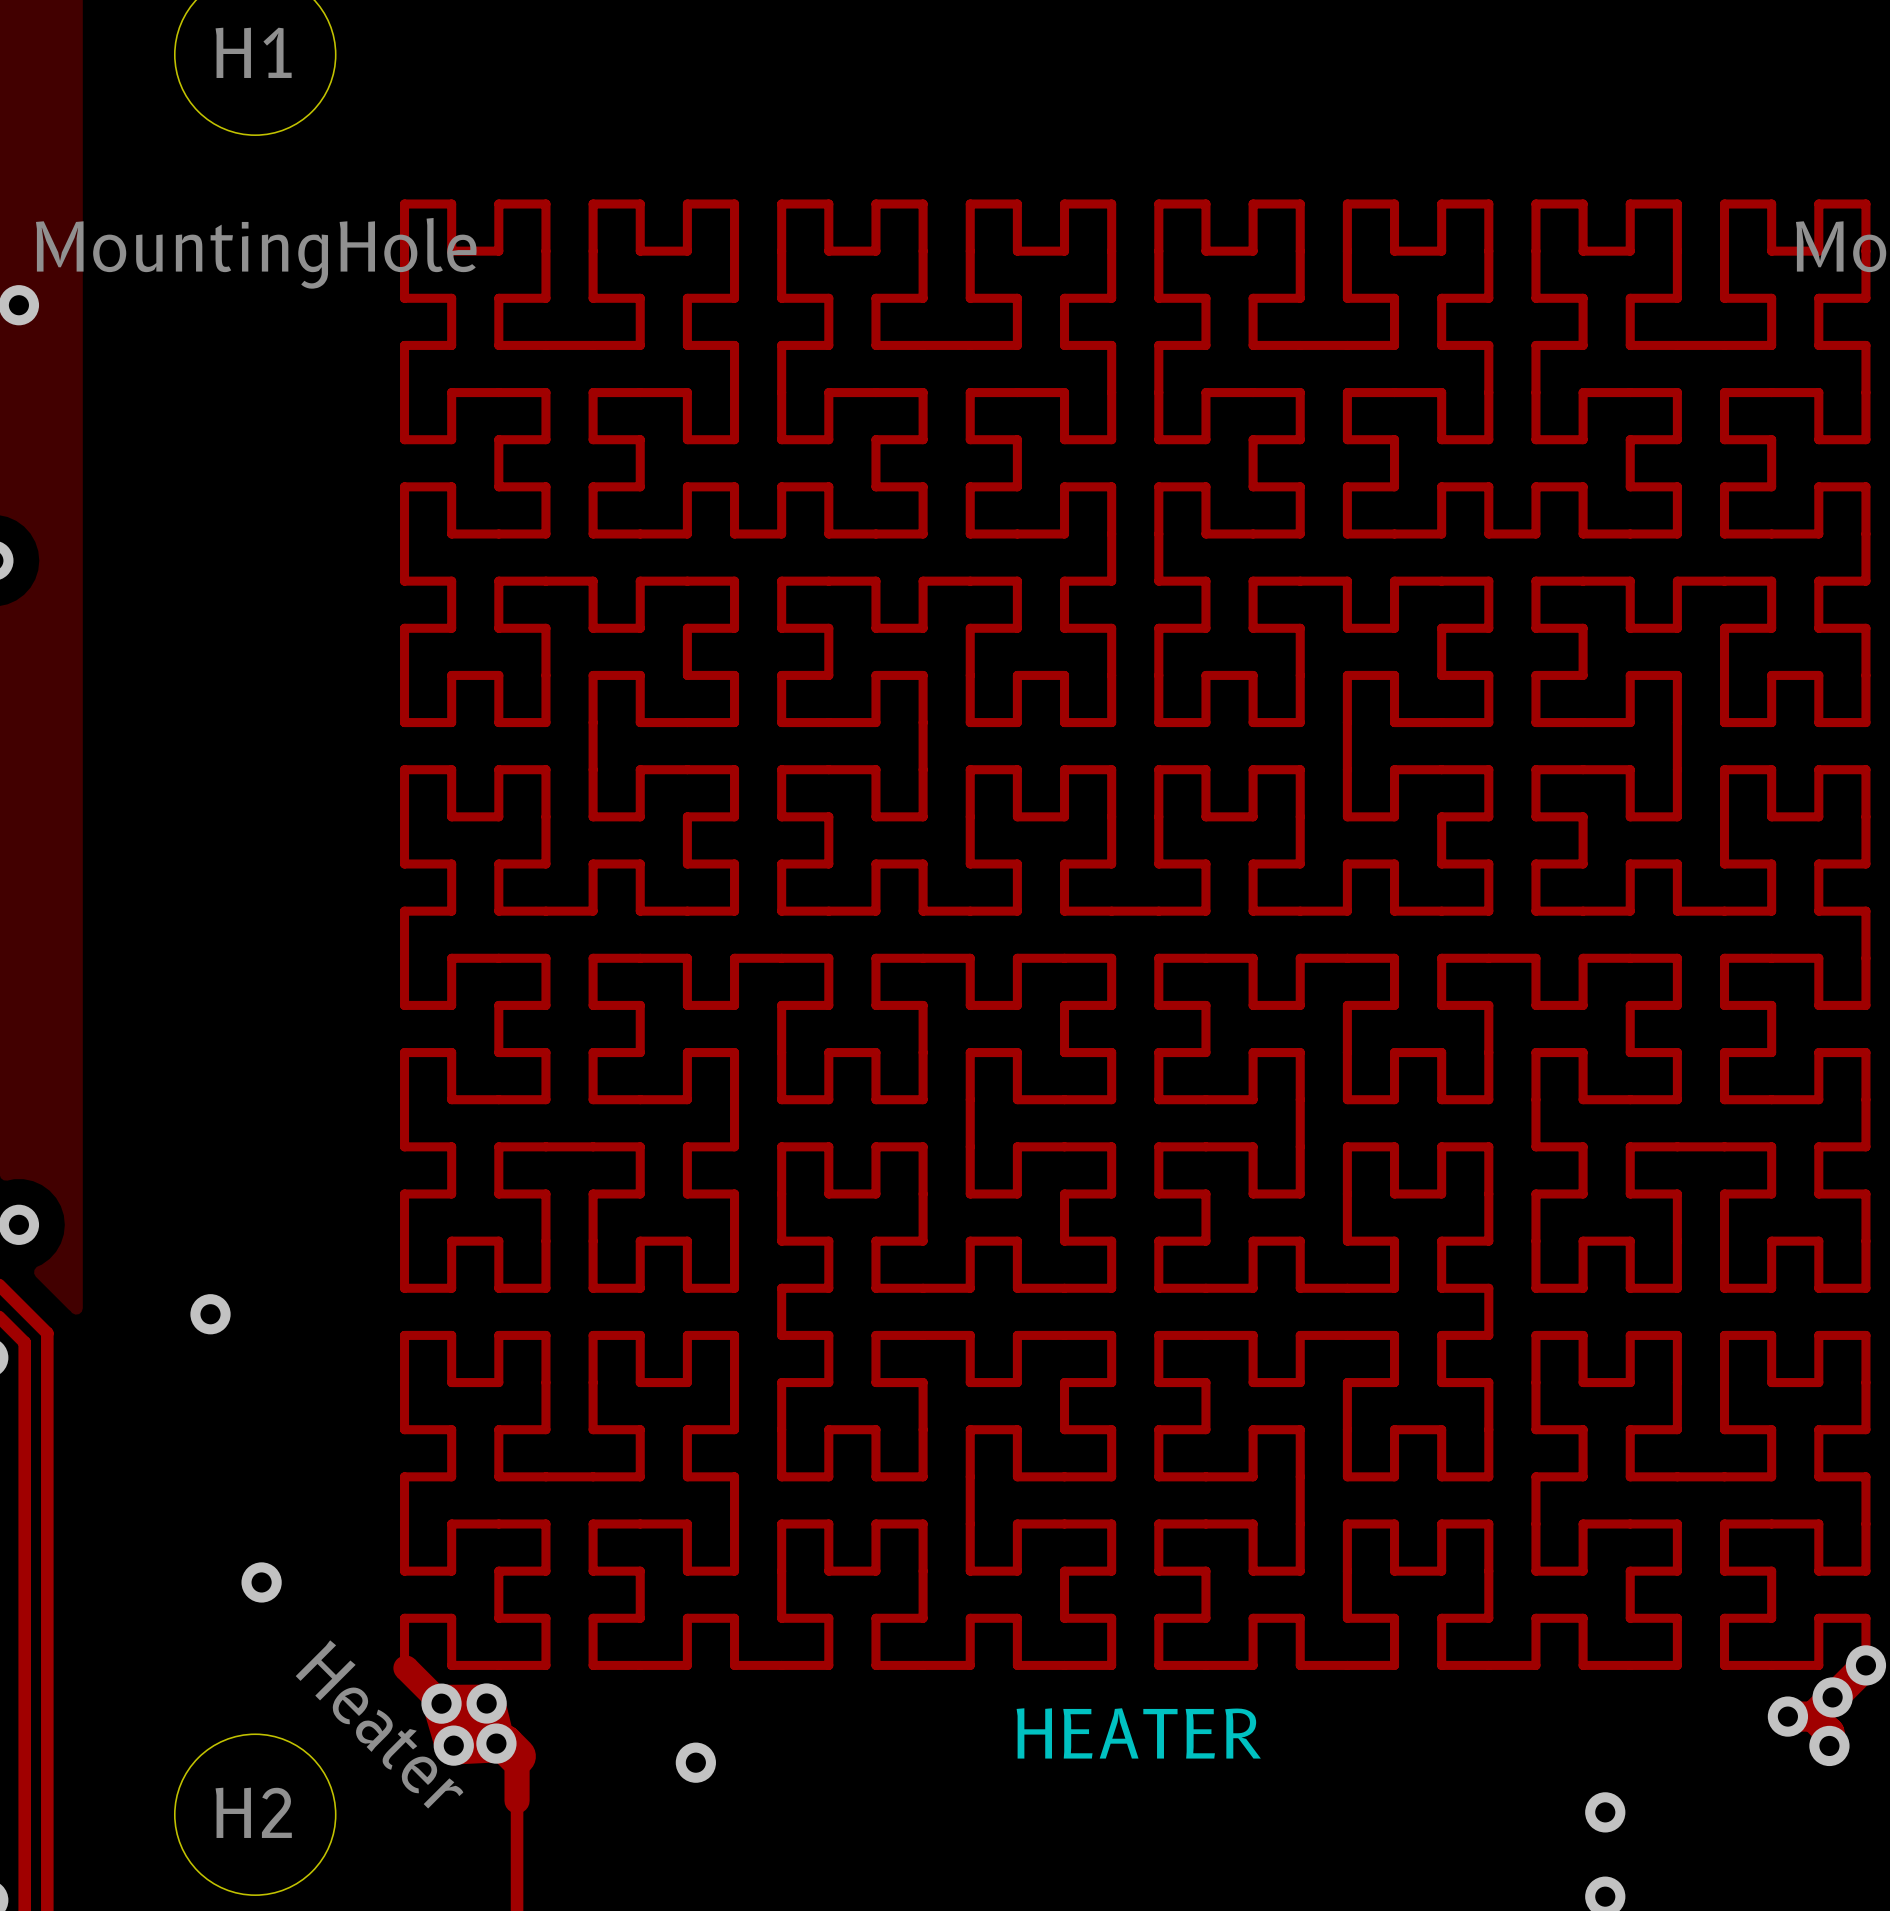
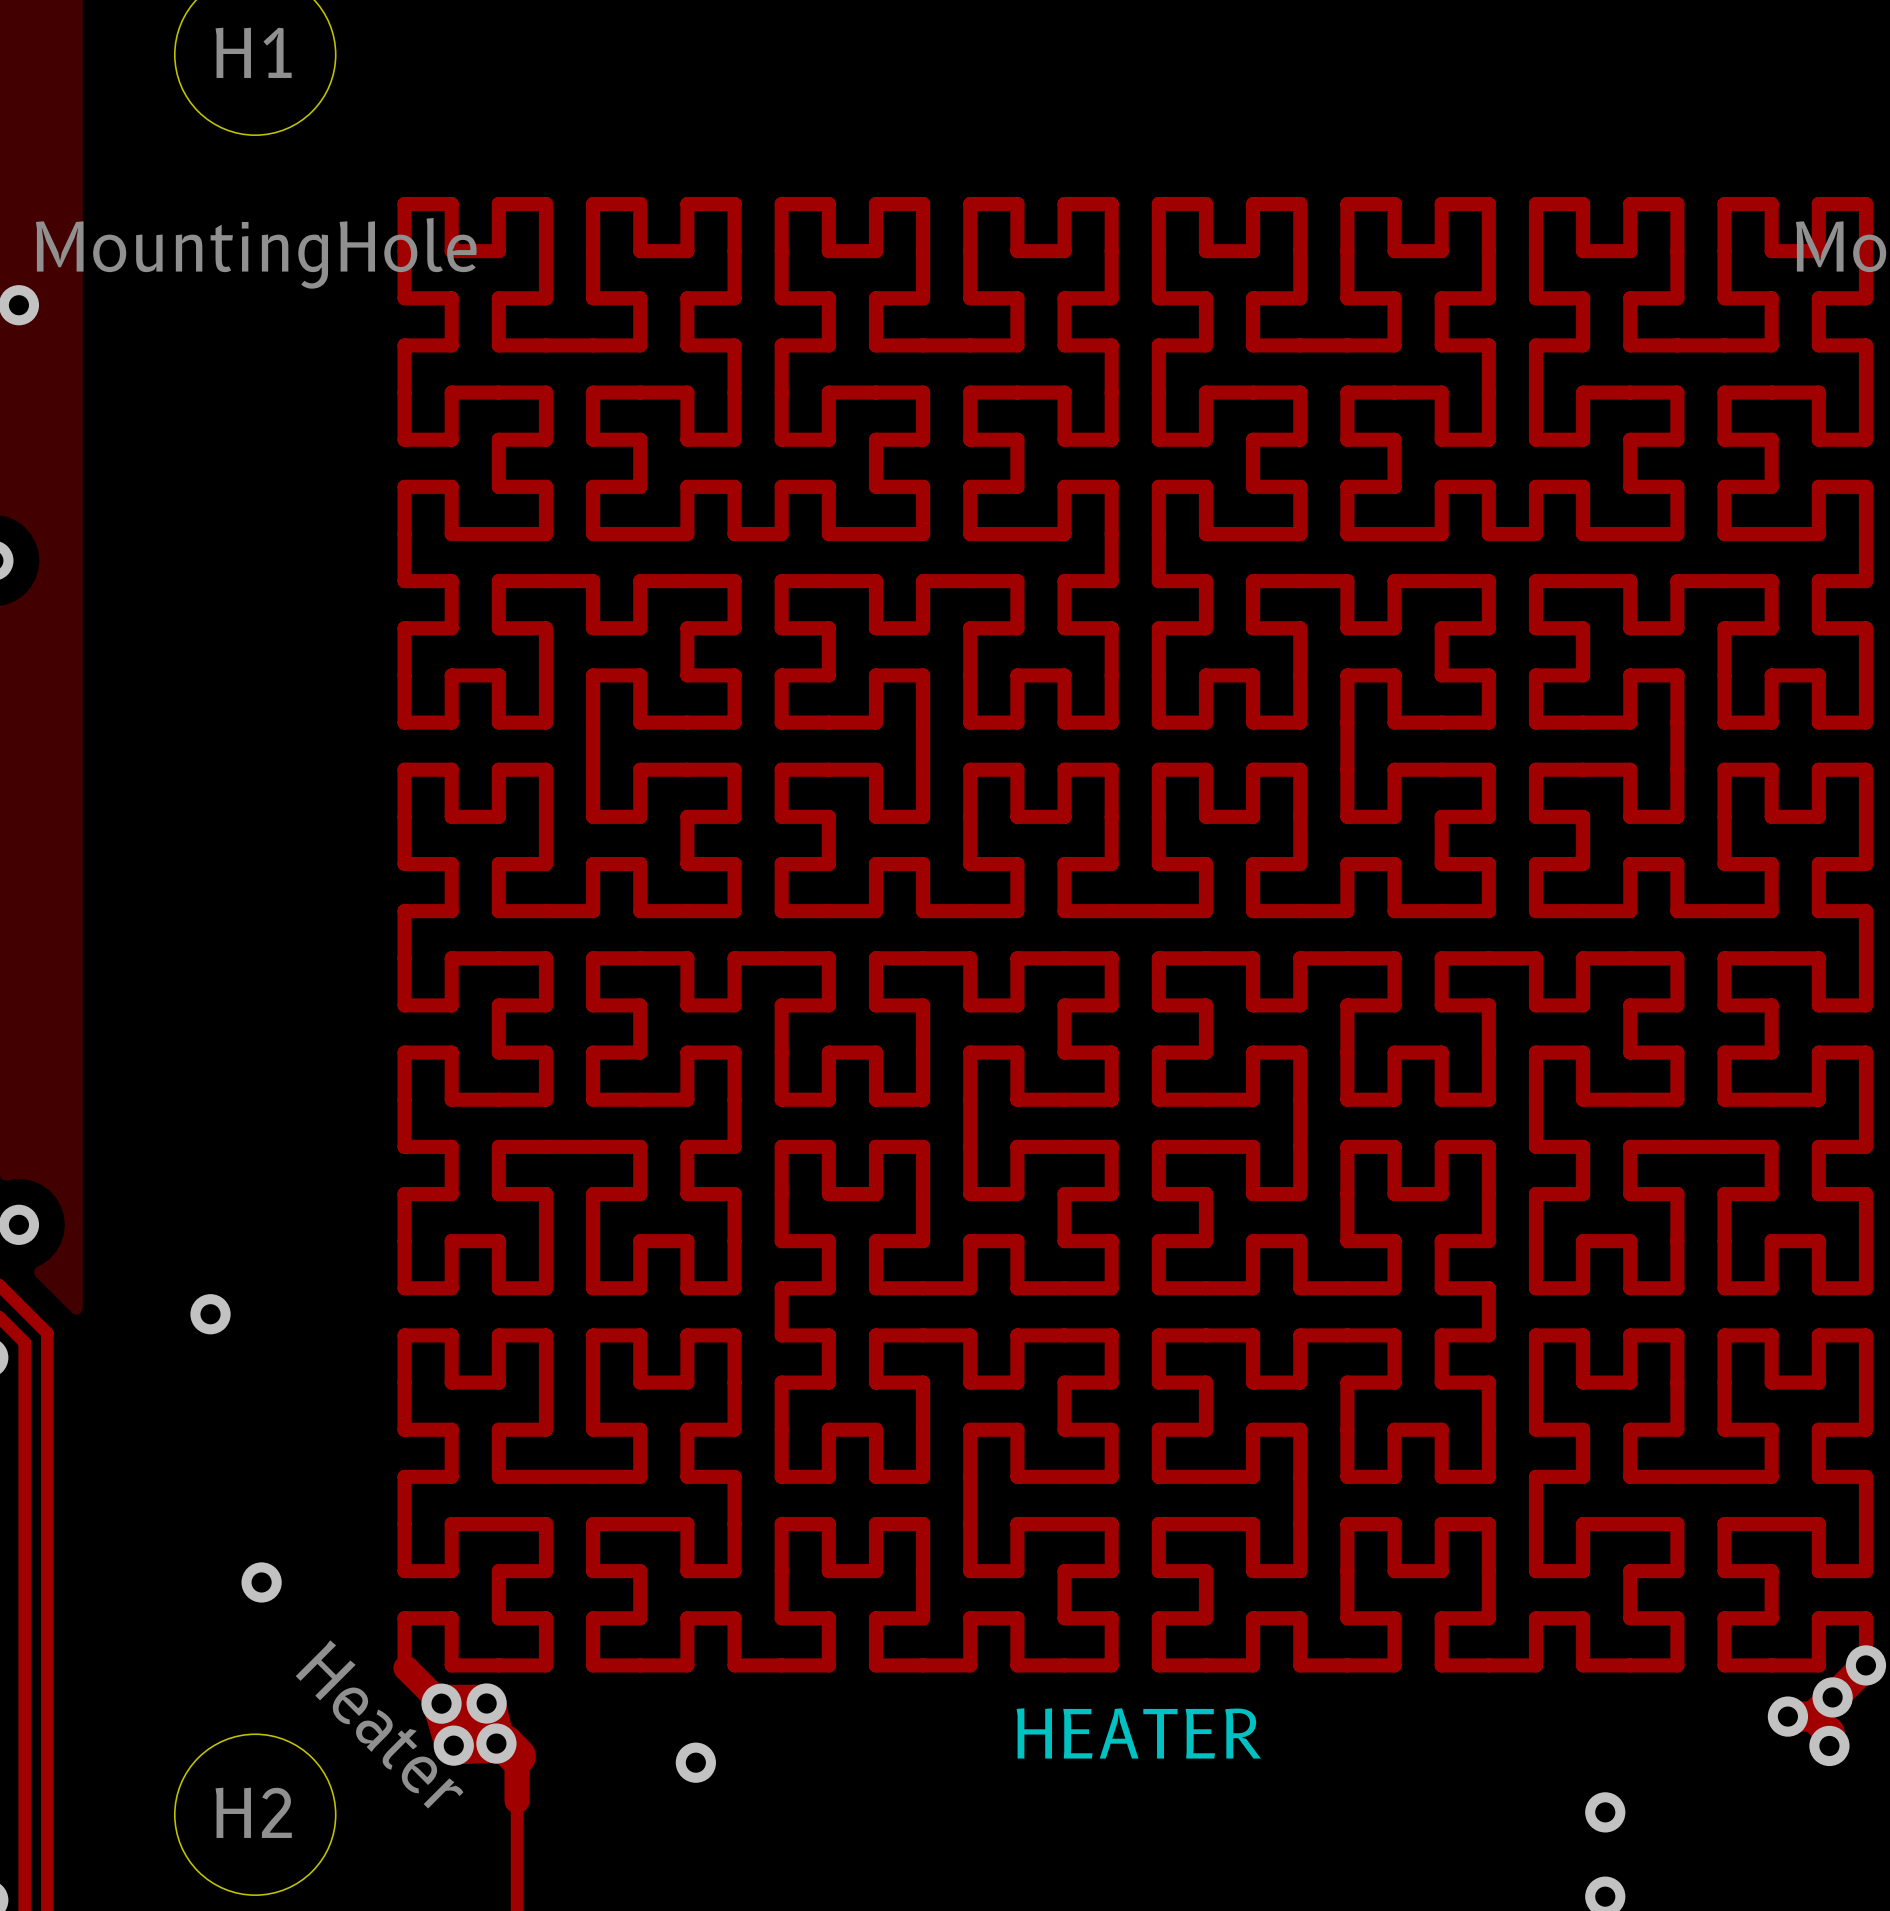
track width: thin (404, 1665) (404, 1618) (451, 1618) (451, 1665) (545, 1665) (545, 1618) (498, 1618) (498, 1571) (545, 1571) (545, 1523) (451, 1523) (451, 1571) (404, 1571) (404, 1476) (451, 1476) (451, 1429) (404, 1429) (404, 1335) (451, 1335) (451, 1382) (498, 1382) (498, 1335) (545, 1335) (545, 1429) (498, 1429) (498, 1476) (640, 1476) (640, 1429) (593, 1429) (593, 1335) (640, 1335) (640, 1382) (687, 1382) (687, 1335) (734, 1335) (734, 1429) (687, 1429) (687, 1476) (734, 1476) (734, 1571) (687, 1571) (687, 1523) (593, 1523) (593, 1571) (640, 1571) (640, 1618) (593, 1618) (593, 1665) (687, 1665) (687, 1618) (734, 1618) (734, 1665) (828, 1665) (828, 1618) (781, 1618) (781, 1523) (828, 1523) (828, 1571) (875, 1571) (875, 1523) (923, 1523) (923, 1618) (875, 1618) (875, 1665) (970, 1665) (970, 1618) (1017, 1618) (1017, 1665) (1111, 1665) (1111, 1618) (1064, 1618) (1064, 1571) (1111, 1571) (1111, 1523) (1017, 1523) (1017, 1571) (970, 1571) (970, 1429) (1017, 1429) (1017, 1476) (1111, 1476) (1111, 1429) (1064, 1429) (1064, 1382) (1111, 1382) (1111, 1335) (1017, 1335) (1017, 1382) (970, 1382) (970, 1335) (875, 1335) (875, 1382) (923, 1382) (923, 1476) (875, 1476) (875, 1429) (828, 1429) (828, 1476) (781, 1476) (781, 1382) (828, 1382) (828, 1335) (781, 1335) (781, 1288) (828, 1288) (828, 1241) (781, 1241) (781, 1146) (828, 1146) (828, 1193) (875, 1193) (875, 1146) (923, 1146) (923, 1241) (875, 1241) (875, 1288) (970, 1288) (970, 1241) (1017, 1241) (1017, 1288) (1111, 1288) (1111, 1241) (1064, 1241) (1064, 1193) (1111, 1193) (1111, 1146) (1017, 1146) (1017, 1193) (970, 1193) (970, 1052) (1017, 1052) (1017, 1099) (1111, 1099) (1111, 1052) (1064, 1052) (1064, 1005) (1111, 1005) (1111, 958) (1017, 958) (1017, 1005) (970, 1005) (970, 958) (875, 958) (875, 1005) (923, 1005) (923, 1099) (875, 1099) (875, 1052) (828, 1052) (828, 1099) (781, 1099) (781, 1005) (828, 1005) (828, 958) (734, 958) (734, 1005) (687, 1005) (687, 958) (593, 958) (593, 1005) (640, 1005) (640, 1052) (593, 1052) (593, 1099) (687, 1099) (687, 1052) (734, 1052) (734, 1146) (687, 1146) (687, 1193) (734, 1193) (734, 1288) (687, 1288) (687, 1241) (640, 1241) (640, 1288) (593, 1288) (593, 1193) (640, 1193) (640, 1146) (498, 1146) (498, 1193) (545, 1193) (545, 1288) (498, 1288) (498, 1241) (451, 1241) (451, 1288) (404, 1288) (404, 1193) (451, 1193) (451, 1146) (404, 1146) (404, 1052) (451, 1052) (451, 1099) (545, 1099) (545, 1052) (498, 1052) (498, 1005) (545, 1005) (545, 958) (451, 958) (451, 1005) (404, 1005) (404, 911) (451, 911) (451, 863) (404, 863) (404, 769) (451, 769) (451, 816) (498, 816) (498, 769) (545, 769) (545, 863) (498, 863) (498, 911) (593, 911) (593, 863) (640, 863) (640, 911) (734, 911) (734, 863) (687, 863) (687, 816) (734, 816) (734, 769) (640, 769) (640, 816) (593, 816) (593, 675) (640, 675) (640, 722) (734, 722) (734, 675) (687, 675) (687, 628) (734, 628) (734, 581) (640, 581) (640, 628) (593, 628) (593, 581) (498, 581) (498, 628) (545, 628) (545, 722) (498, 722) (498, 675) (451, 675) (451, 722) (404, 722) (404, 628) (451, 628) (451, 581) (404, 581) (404, 486) (451, 486) (451, 533) (545, 533) (545, 486) (498, 486) (498, 439) (545, 439) (545, 392) (451, 392) (451, 439) (404, 439) (404, 345) (451, 345) (451, 298) (404, 298) (404, 204) (451, 204) (451, 251) (498, 251) (498, 204) (545, 204) (545, 298) (498, 298) (498, 345) (640, 345) (640, 298) (593, 298) (593, 204) (640, 204) (640, 251) (687, 251) (687, 204) (734, 204) (734, 298) (687, 298) (687, 345) (734, 345) (734, 439) (687, 439) (687, 392) (593, 392) (593, 439) (640, 439) (640, 486) (593, 486) (593, 533) (687, 533) (687, 486) (734, 486) (734, 533) (781, 533) (781, 486) (828, 486) (828, 533) (923, 533) (923, 486) (875, 486) (875, 439) (923, 439) (923, 392) (828, 392) (828, 439) (781, 439) (781, 345) (828, 345) (828, 298) (781, 298) (781, 204) (828, 204) (828, 251) (875, 251) (875, 204) (923, 204) (923, 298) (875, 298) (875, 345) (1017, 345) (1017, 298) (970, 298) (970, 204) (1017, 204) (1017, 251) (1064, 251) (1064, 204) (1111, 204) (1111, 298) (1064, 298) (1064, 345) (1111, 345) (1111, 439) (1064, 439) (1064, 392) (970, 392) (970, 439) (1017, 439) (1017, 486) (970, 486) (970, 533) (1064, 533) (1064, 486) (1111, 486) (1111, 581) (1064, 581) (1064, 628) (1111, 628) (1111, 722) (1064, 722) (1064, 675) (1017, 675) (1017, 722) (970, 722) (970, 628) (1017, 628) (1017, 581) (923, 581) (923, 628) (875, 628) (875, 581) (781, 581) (781, 628) (828, 628) (828, 675) (781, 675) (781, 722) (875, 722) (875, 675) (923, 675) (923, 816) (875, 816) (875, 769) (781, 769) (781, 816) (828, 816) (828, 863) (781, 863) (781, 911) (875, 911) (875, 863) (923, 863) (923, 911) (1017, 911) (1017, 863) (970, 863) (970, 769) (1017, 769) (1017, 816) (1064, 816) (1064, 769) (1111, 769) (1111, 863) (1064, 863) (1064, 911) (1205, 911) (1205, 863) (1158, 863) (1158, 769) (1205, 769) (1205, 816) (1253, 816) (1253, 769) (1300, 769) (1300, 863) (1253, 863) (1253, 911) (1347, 911) (1347, 863) (1394, 863) (1394, 911) (1488, 911) (1488, 863) (1441, 863) (1441, 816) (1488, 816) (1488, 769) (1394, 769) (1394, 816) (1347, 816) (1347, 675) (1394, 675) (1394, 722) (1488, 722) (1488, 675) (1441, 675) (1441, 628) (1488, 628) (1488, 581) (1394, 581) (1394, 628) (1347, 628) (1347, 581) (1253, 581) (1253, 628) (1300, 628) (1300, 722) (1253, 722) (1253, 675) (1205, 675) (1205, 722) (1158, 722) (1158, 628) (1205, 628) (1205, 581) (1158, 581) (1158, 486) (1205, 486) (1205, 533) (1300, 533) (1300, 486) (1253, 486) (1253, 439) (1300, 439) (1300, 392) (1205, 392) (1205, 439) (1158, 439) (1158, 345) (1205, 345) (1205, 298) (1158, 298) (1158, 204) (1205, 204) (1205, 251) (1253, 251) (1253, 204) (1300, 204) (1300, 298) (1253, 298) (1253, 345) (1394, 345) (1394, 298) (1347, 298) (1347, 204) (1394, 204) (1394, 251) (1441, 251) (1441, 204) (1488, 204) (1488, 298) (1441, 298) (1441, 345) (1488, 345) (1488, 439) (1441, 439) (1441, 392) (1347, 392) (1347, 439) (1394, 439) (1394, 486) (1347, 486) (1347, 533) (1441, 533) (1441, 486) (1488, 486) (1488, 533) (1535, 533) (1535, 486) (1583, 486) (1583, 533) (1677, 533) (1677, 486) (1630, 486) (1630, 439) (1677, 439) (1677, 392) (1583, 392) (1583, 439) (1535, 439) (1535, 345) (1583, 345) (1583, 298) (1535, 298) (1535, 204) (1583, 204) (1583, 251) (1630, 251) (1630, 204) (1677, 204) (1677, 298) (1630, 298) (1630, 345) (1771, 345) (1771, 298) (1724, 298) (1724, 204) (1771, 204) (1771, 251) (1818, 251) (1818, 204) (1865, 204) (1865, 298) (1818, 298) (1818, 345) (1865, 345) (1865, 439) (1818, 439) (1818, 392) (1724, 392) (1724, 439) (1771, 439) (1771, 486) (1724, 486) (1724, 533) (1818, 533) (1818, 486) (1865, 486) (1865, 581) (1818, 581) (1818, 628) (1865, 628) (1865, 722) (1818, 722) (1818, 675) (1771, 675) (1771, 722) (1724, 722) (1724, 628) (1771, 628) (1771, 581) (1677, 581) (1677, 628) (1630, 628) (1630, 581) (1535, 581) (1535, 628) (1583, 628) (1583, 675) (1535, 675) (1535, 722) (1630, 722) (1630, 675) (1677, 675) (1677, 816) (1630, 816) (1630, 769) (1535, 769) (1535, 816) (1583, 816) (1583, 863) (1535, 863) (1535, 911) (1630, 911) (1630, 863) (1677, 863) (1677, 911) (1771, 911) (1771, 863) (1724, 863) (1724, 769) (1771, 769) (1771, 816) (1818, 816) (1818, 769) (1865, 769) (1865, 863) (1818, 863) (1818, 911) (1865, 911) (1865, 1005) (1818, 1005) (1818, 958) (1724, 958) (1724, 1005) (1771, 1005) (1771, 1052) (1724, 1052) (1724, 1099) (1818, 1099) (1818, 1052) (1865, 1052) (1865, 1146) (1818, 1146) (1818, 1193) (1865, 1193) (1865, 1288) (1818, 1288) (1818, 1241) (1771, 1241) (1771, 1288) (1724, 1288) (1724, 1193) (1771, 1193) (1771, 1146) (1630, 1146) (1630, 1193) (1677, 1193) (1677, 1288) (1630, 1288) (1630, 1241) (1583, 1241) (1583, 1288) (1535, 1288) (1535, 1193) (1583, 1193) (1583, 1146) (1535, 1146) (1535, 1052) (1583, 1052) (1583, 1099) (1677, 1099) (1677, 1052) (1630, 1052) (1630, 1005) (1677, 1005) (1677, 958) (1583, 958) (1583, 1005) (1535, 1005) (1535, 958) (1441, 958) (1441, 1005) (1488, 1005) (1488, 1099) (1441, 1099) (1441, 1052) (1394, 1052) (1394, 1099) (1347, 1099) (1347, 1005) (1394, 1005) (1394, 958) (1300, 958) (1300, 1005) (1253, 1005) (1253, 958) (1158, 958) (1158, 1005) (1205, 1005) (1205, 1052) (1158, 1052) (1158, 1099) (1253, 1099) (1253, 1052) (1300, 1052) (1300, 1193) (1253, 1193) (1253, 1146) (1158, 1146) (1158, 1193) (1205, 1193) (1205, 1241) (1158, 1241) (1158, 1288) (1253, 1288) (1253, 1241) (1300, 1241) (1300, 1288) (1394, 1288) (1394, 1241) (1347, 1241) (1347, 1146) (1394, 1146) (1394, 1193) (1441, 1193) (1441, 1146) (1488, 1146) (1488, 1241) (1441, 1241) (1441, 1288) (1488, 1288) (1488, 1335) (1441, 1335) (1441, 1382) (1488, 1382) (1488, 1476) (1441, 1476) (1441, 1429) (1394, 1429) (1394, 1476) (1347, 1476) (1347, 1382) (1394, 1382) (1394, 1335) (1300, 1335) (1300, 1382) (1253, 1382) (1253, 1335) (1158, 1335) (1158, 1382) (1205, 1382) (1205, 1429) (1158, 1429) (1158, 1476) (1253, 1476) (1253, 1429) (1300, 1429) (1300, 1571) (1253, 1571) (1253, 1523) (1158, 1523) (1158, 1571) (1205, 1571) (1205, 1618) (1158, 1618) (1158, 1665) (1253, 1665) (1253, 1618) (1300, 1618) (1300, 1665) (1394, 1665) (1394, 1618) (1347, 1618) (1347, 1523) (1394, 1523) (1394, 1571) (1441, 1571) (1441, 1523) (1488, 1523) (1488, 1618) (1441, 1618) (1441, 1665) (1535, 1665) (1535, 1618) (1583, 1618) (1583, 1665) (1677, 1665) (1677, 1618) (1630, 1618) (1630, 1571) (1677, 1571) (1677, 1523) (1583, 1523) (1583, 1571) (1535, 1571) (1535, 1476) (1583, 1476) (1583, 1429) (1535, 1429) (1535, 1335) (1583, 1335) (1583, 1382) (1630, 1382) (1630, 1335) (1677, 1335) (1677, 1429) (1630, 1429) (1630, 1476) (1771, 1476) (1771, 1429) (1724, 1429) (1724, 1335) (1771, 1335) (1771, 1382) (1818, 1382) (1818, 1335) (1865, 1335) (1865, 1429) (1818, 1429) (1818, 1476) (1865, 1476) (1865, 1571) (1818, 1571) (1818, 1523) (1724, 1523) (1724, 1571) (1771, 1571) (1771, 1618) (1724, 1618) (1724, 1665) (1818, 1665) (1818, 1618) (1865, 1618) (1865, 1665) -> thick (404, 1665) (404, 1618) (451, 1618) (451, 1665) (545, 1665) (545, 1618) (498, 1618) (498, 1571) (545, 1571) (545, 1523) (451, 1523) (451, 1571) (404, 1571) (404, 1476) (451, 1476) (451, 1429) (404, 1429) (404, 1335) (451, 1335) (451, 1382) (498, 1382) (498, 1335) (545, 1335) (545, 1429) (498, 1429) (498, 1476) (640, 1476) (640, 1429) (593, 1429) (593, 1335) (640, 1335) (640, 1382) (687, 1382) (687, 1335) (734, 1335) (734, 1429) (687, 1429) (687, 1476) (734, 1476) (734, 1571) (687, 1571) (687, 1523) (593, 1523) (593, 1571) (640, 1571) (640, 1618) (593, 1618) (593, 1665) (687, 1665) (687, 1618) (734, 1618) (734, 1665) (828, 1665) (828, 1618) (781, 1618) (781, 1523) (828, 1523) (828, 1571) (875, 1571) (875, 1523) (923, 1523) (923, 1618) (875, 1618) (875, 1665) (970, 1665) (970, 1618) (1017, 1618) (1017, 1665) (1111, 1665) (1111, 1618) (1064, 1618) (1064, 1571) (1111, 1571) (1111, 1523) (1017, 1523) (1017, 1571) (970, 1571) (970, 1429) (1017, 1429) (1017, 1476) (1111, 1476) (1111, 1429) (1064, 1429) (1064, 1382) (1111, 1382) (1111, 1335) (1017, 1335) (1017, 1382) (970, 1382) (970, 1335) (875, 1335) (875, 1382) (923, 1382) (923, 1476) (875, 1476) (875, 1429) (828, 1429) (828, 1476) (781, 1476) (781, 1382) (828, 1382) (828, 1335) (781, 1335) (781, 1288) (828, 1288) (828, 1241) (781, 1241) (781, 1146) (828, 1146) (828, 1193) (875, 1193) (875, 1146) (923, 1146) (923, 1241) (875, 1241) (875, 1288) (970, 1288) (970, 1241) (1017, 1241) (1017, 1288) (1111, 1288) (1111, 1241) (1064, 1241) (1064, 1193) (1111, 1193) (1111, 1146) (1017, 1146) (1017, 1193) (970, 1193) (970, 1052) (1017, 1052) (1017, 1099) (1111, 1099) (1111, 1052) (1064, 1052) (1064, 1005) (1111, 1005) (1111, 958) (1017, 958) (1017, 1005) (970, 1005) (970, 958) (875, 958) (875, 1005) (923, 1005) (923, 1099) (875, 1099) (875, 1052) (828, 1052) (828, 1099) (781, 1099) (781, 1005) (828, 1005) (828, 958) (734, 958) (734, 1005) (687, 1005) (687, 958) (593, 958) (593, 1005) (640, 1005) (640, 1052) (593, 1052) (593, 1099) (687, 1099) (687, 1052) (734, 1052) (734, 1146) (687, 1146) (687, 1193) (734, 1193) (734, 1288) (687, 1288) (687, 1241) (640, 1241) (640, 1288) (593, 1288) (593, 1193) (640, 1193) (640, 1146) (498, 1146) (498, 1193) (545, 1193) (545, 1288) (498, 1288) (498, 1241) (451, 1241) (451, 1288) (404, 1288) (404, 1193) (451, 1193) (451, 1146) (404, 1146) (404, 1052) (451, 1052) (451, 1099) (545, 1099) (545, 1052) (498, 1052) (498, 1005) (545, 1005) (545, 958) (451, 958) (451, 1005) (404, 1005) (404, 911) (451, 911) (451, 863) (404, 863) (404, 769) (451, 769) (451, 816) (498, 816) (498, 769) (545, 769) (545, 863) (498, 863) (498, 911) (593, 911) (593, 863) (640, 863) (640, 911) (734, 911) (734, 863) (687, 863) (687, 816) (734, 816) (734, 769) (640, 769) (640, 816) (593, 816) (593, 675) (640, 675) (640, 722) (734, 722) (734, 675) (687, 675) (687, 628) (734, 628) (734, 581) (640, 581) (640, 628) (593, 628) (593, 581) (498, 581) (498, 628) (545, 628) (545, 722) (498, 722) (498, 675) (451, 675) (451, 722) (404, 722) (404, 628) (451, 628) (451, 581) (404, 581) (404, 486) (451, 486) (451, 533) (545, 533) (545, 486) (498, 486) (498, 439) (545, 439) (545, 392) (451, 392) (451, 439) (404, 439) (404, 345) (451, 345) (451, 298) (404, 298) (404, 204) (451, 204) (451, 251) (498, 251) (498, 204) (545, 204) (545, 298) (498, 298) (498, 345) (640, 345) (640, 298) (593, 298) (593, 204) (640, 204) (640, 251) (687, 251) (687, 204) (734, 204) (734, 298) (687, 298) (687, 345) (734, 345) (734, 439) (687, 439) (687, 392) (593, 392) (593, 439) (640, 439) (640, 486) (593, 486) (593, 533) (687, 533) (687, 486) (734, 486) (734, 533) (781, 533) (781, 486) (828, 486) (828, 533) (923, 533) (923, 486) (875, 486) (875, 439) (923, 439) (923, 392) (828, 392) (828, 439) (781, 439) (781, 345) (828, 345) (828, 298) (781, 298) (781, 204) (828, 204) (828, 251) (875, 251) (875, 204) (923, 204) (923, 298) (875, 298) (875, 345) (1017, 345) (1017, 298) (970, 298) (970, 204) (1017, 204) (1017, 251) (1064, 251) (1064, 204) (1111, 204) (1111, 298) (1064, 298) (1064, 345) (1111, 345) (1111, 439) (1064, 439) (1064, 392) (970, 392) (970, 439) (1017, 439) (1017, 486) (970, 486) (970, 533) (1064, 533) (1064, 486) (1111, 486) (1111, 581) (1064, 581) (1064, 628) (1111, 628) (1111, 722) (1064, 722) (1064, 675) (1017, 675) (1017, 722) (970, 722) (970, 628) (1017, 628) (1017, 581) (923, 581) (923, 628) (875, 628) (875, 581) (781, 581) (781, 628) (828, 628) (828, 675) (781, 675) (781, 722) (875, 722) (875, 675) (923, 675) (923, 816) (875, 816) (875, 769) (781, 769) (781, 816) (828, 816) (828, 863) (781, 863) (781, 911) (875, 911) (875, 863) (923, 863) (923, 911) (1017, 911) (1017, 863) (970, 863) (970, 769) (1017, 769) (1017, 816) (1064, 816) (1064, 769) (1111, 769) (1111, 863) (1064, 863) (1064, 911) (1205, 911) (1205, 863) (1158, 863) (1158, 769) (1205, 769) (1205, 816) (1253, 816) (1253, 769) (1300, 769) (1300, 863) (1253, 863) (1253, 911) (1347, 911) (1347, 863) (1394, 863) (1394, 911) (1488, 911) (1488, 863) (1441, 863) (1441, 816) (1488, 816) (1488, 769) (1394, 769) (1394, 816) (1347, 816) (1347, 675) (1394, 675) (1394, 722) (1488, 722) (1488, 675) (1441, 675) (1441, 628) (1488, 628) (1488, 581) (1394, 581) (1394, 628) (1347, 628) (1347, 581) (1253, 581) (1253, 628) (1300, 628) (1300, 722) (1253, 722) (1253, 675) (1205, 675) (1205, 722) (1158, 722) (1158, 628) (1205, 628) (1205, 581) (1158, 581) (1158, 486) (1205, 486) (1205, 533) (1300, 533) (1300, 486) (1253, 486) (1253, 439) (1300, 439) (1300, 392) (1205, 392) (1205, 439) (1158, 439) (1158, 345) (1205, 345) (1205, 298) (1158, 298) (1158, 204) (1205, 204) (1205, 251) (1253, 251) (1253, 204) (1300, 204) (1300, 298) (1253, 298) (1253, 345) (1394, 345) (1394, 298) (1347, 298) (1347, 204) (1394, 204) (1394, 251) (1441, 251) (1441, 204) (1488, 204) (1488, 298) (1441, 298) (1441, 345) (1488, 345) (1488, 439) (1441, 439) (1441, 392) (1347, 392) (1347, 439) (1394, 439) (1394, 486) (1347, 486) (1347, 533) (1441, 533) (1441, 486) (1488, 486) (1488, 533) (1535, 533) (1535, 486) (1583, 486) (1583, 533) (1677, 533) (1677, 486) (1630, 486) (1630, 439) (1677, 439) (1677, 392) (1583, 392) (1583, 439) (1535, 439) (1535, 345) (1583, 345) (1583, 298) (1535, 298) (1535, 204) (1583, 204) (1583, 251) (1630, 251) (1630, 204) (1677, 204) (1677, 298) (1630, 298) (1630, 345) (1771, 345) (1771, 298) (1724, 298) (1724, 204) (1771, 204) (1771, 251) (1818, 251) (1818, 204) (1865, 204) (1865, 298) (1818, 298) (1818, 345) (1865, 345) (1865, 439) (1818, 439) (1818, 392) (1724, 392) (1724, 439) (1771, 439) (1771, 486) (1724, 486) (1724, 533) (1818, 533) (1818, 486) (1865, 486) (1865, 581) (1818, 581) (1818, 628) (1865, 628) (1865, 722) (1818, 722) (1818, 675) (1771, 675) (1771, 722) (1724, 722) (1724, 628) (1771, 628) (1771, 581) (1677, 581) (1677, 628) (1630, 628) (1630, 581) (1535, 581) (1535, 628) (1583, 628) (1583, 675) (1535, 675) (1535, 722) (1630, 722) (1630, 675) (1677, 675) (1677, 816) (1630, 816) (1630, 769) (1535, 769) (1535, 816) (1583, 816) (1583, 863) (1535, 863) (1535, 911) (1630, 911) (1630, 863) (1677, 863) (1677, 911) (1771, 911) (1771, 863) (1724, 863) (1724, 769) (1771, 769) (1771, 816) (1818, 816) (1818, 769) (1865, 769) (1865, 863) (1818, 863) (1818, 911) (1865, 911) (1865, 1005) (1818, 1005) (1818, 958) (1724, 958) (1724, 1005) (1771, 1005) (1771, 1052) (1724, 1052) (1724, 1099) (1818, 1099) (1818, 1052) (1865, 1052) (1865, 1146) (1818, 1146) (1818, 1193) (1865, 1193) (1865, 1288) (1818, 1288) (1818, 1241) (1771, 1241) (1771, 1288) (1724, 1288) (1724, 1193) (1771, 1193) (1771, 1146) (1630, 1146) (1630, 1193) (1677, 1193) (1677, 1288) (1630, 1288) (1630, 1241) (1583, 1241) (1583, 1288) (1535, 1288) (1535, 1193) (1583, 1193) (1583, 1146) (1535, 1146) (1535, 1052) (1583, 1052) (1583, 1099) (1677, 1099) (1677, 1052) (1630, 1052) (1630, 1005) (1677, 1005) (1677, 958) (1583, 958) (1583, 1005) (1535, 1005) (1535, 958) (1441, 958) (1441, 1005) (1488, 1005) (1488, 1099) (1441, 1099) (1441, 1052) (1394, 1052) (1394, 1099) (1347, 1099) (1347, 1005) (1394, 1005) (1394, 958) (1300, 958) (1300, 1005) (1253, 1005) (1253, 958) (1158, 958) (1158, 1005) (1205, 1005) (1205, 1052) (1158, 1052) (1158, 1099) (1253, 1099) (1253, 1052) (1300, 1052) (1300, 1193) (1253, 1193) (1253, 1146) (1158, 1146) (1158, 1193) (1205, 1193) (1205, 1241) (1158, 1241) (1158, 1288) (1253, 1288) (1253, 1241) (1300, 1241) (1300, 1288) (1394, 1288) (1394, 1241) (1347, 1241) (1347, 1146) (1394, 1146) (1394, 1193) (1441, 1193) (1441, 1146) (1488, 1146) (1488, 1241) (1441, 1241) (1441, 1288) (1488, 1288) (1488, 1335) (1441, 1335) (1441, 1382) (1488, 1382) (1488, 1476) (1441, 1476) (1441, 1429) (1394, 1429) (1394, 1476) (1347, 1476) (1347, 1382) (1394, 1382) (1394, 1335) (1300, 1335) (1300, 1382) (1253, 1382) (1253, 1335) (1158, 1335) (1158, 1382) (1205, 1382) (1205, 1429) (1158, 1429) (1158, 1476) (1253, 1476) (1253, 1429) (1300, 1429) (1300, 1571) (1253, 1571) (1253, 1523) (1158, 1523) (1158, 1571) (1205, 1571) (1205, 1618) (1158, 1618) (1158, 1665) (1253, 1665) (1253, 1618) (1300, 1618) (1300, 1665) (1394, 1665) (1394, 1618) (1347, 1618) (1347, 1523) (1394, 1523) (1394, 1571) (1441, 1571) (1441, 1523) (1488, 1523) (1488, 1618) (1441, 1618) (1441, 1665) (1535, 1665) (1535, 1618) (1583, 1618) (1583, 1665) (1677, 1665) (1677, 1618) (1630, 1618) (1630, 1571) (1677, 1571) (1677, 1523) (1583, 1523) (1583, 1571) (1535, 1571) (1535, 1476) (1583, 1476) (1583, 1429) (1535, 1429) (1535, 1335) (1583, 1335) (1583, 1382) (1630, 1382) (1630, 1335) (1677, 1335) (1677, 1429) (1630, 1429) (1630, 1476) (1771, 1476) (1771, 1429) (1724, 1429) (1724, 1335) (1771, 1335) (1771, 1382) (1818, 1382) (1818, 1335) (1865, 1335) (1865, 1429) (1818, 1429) (1818, 1476) (1865, 1476) (1865, 1571) (1818, 1571) (1818, 1523) (1724, 1523) (1724, 1571) (1771, 1571) (1771, 1618) (1724, 1618) (1724, 1665) (1818, 1665) (1818, 1618) (1865, 1618) (1865, 1665)

